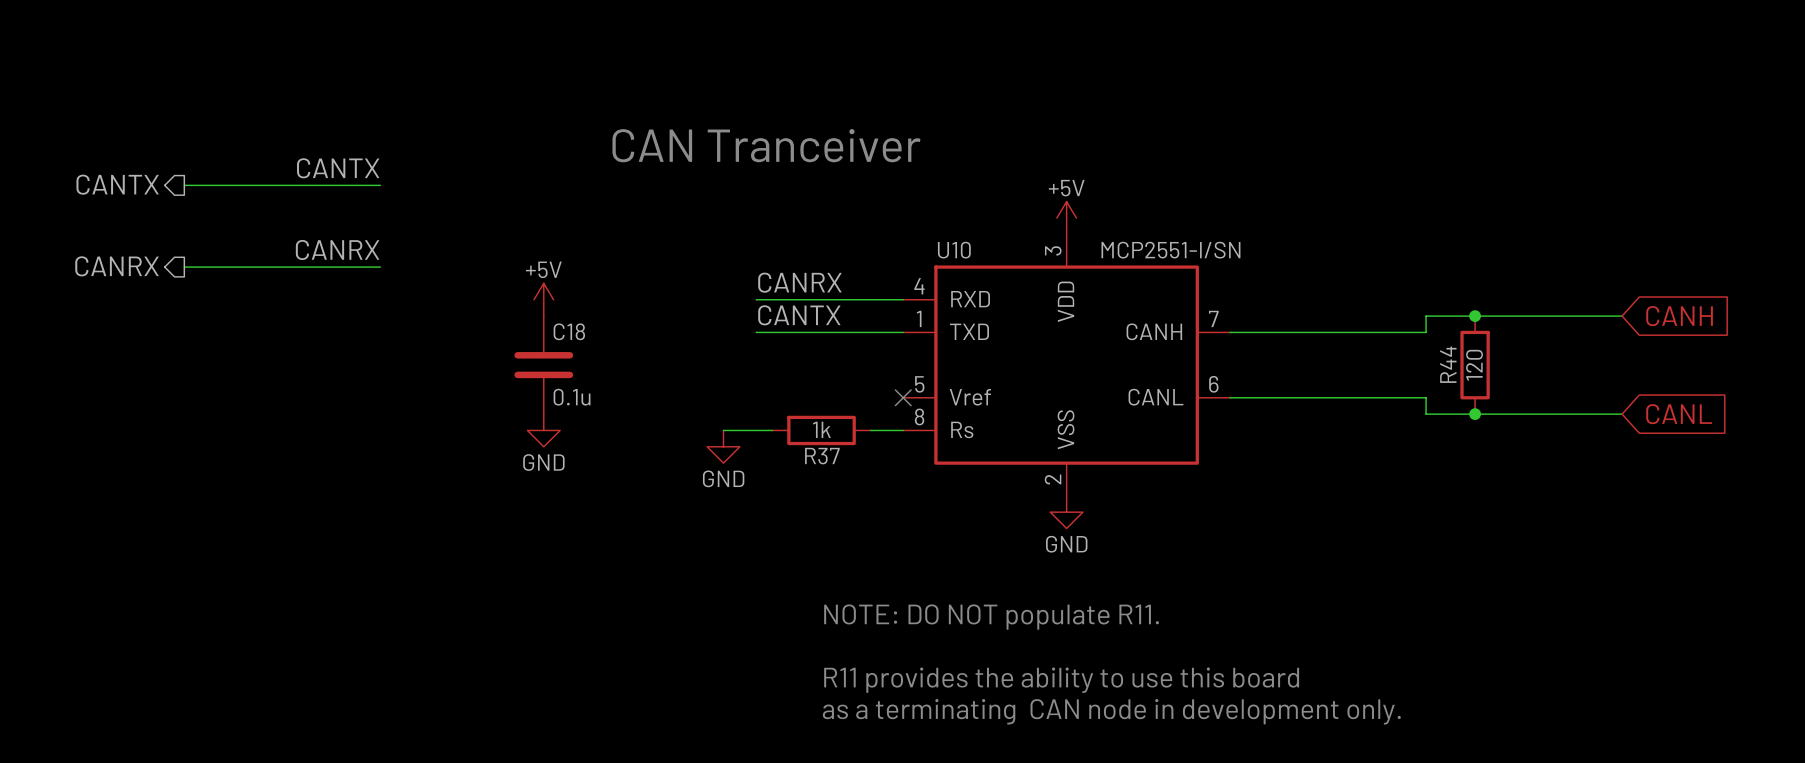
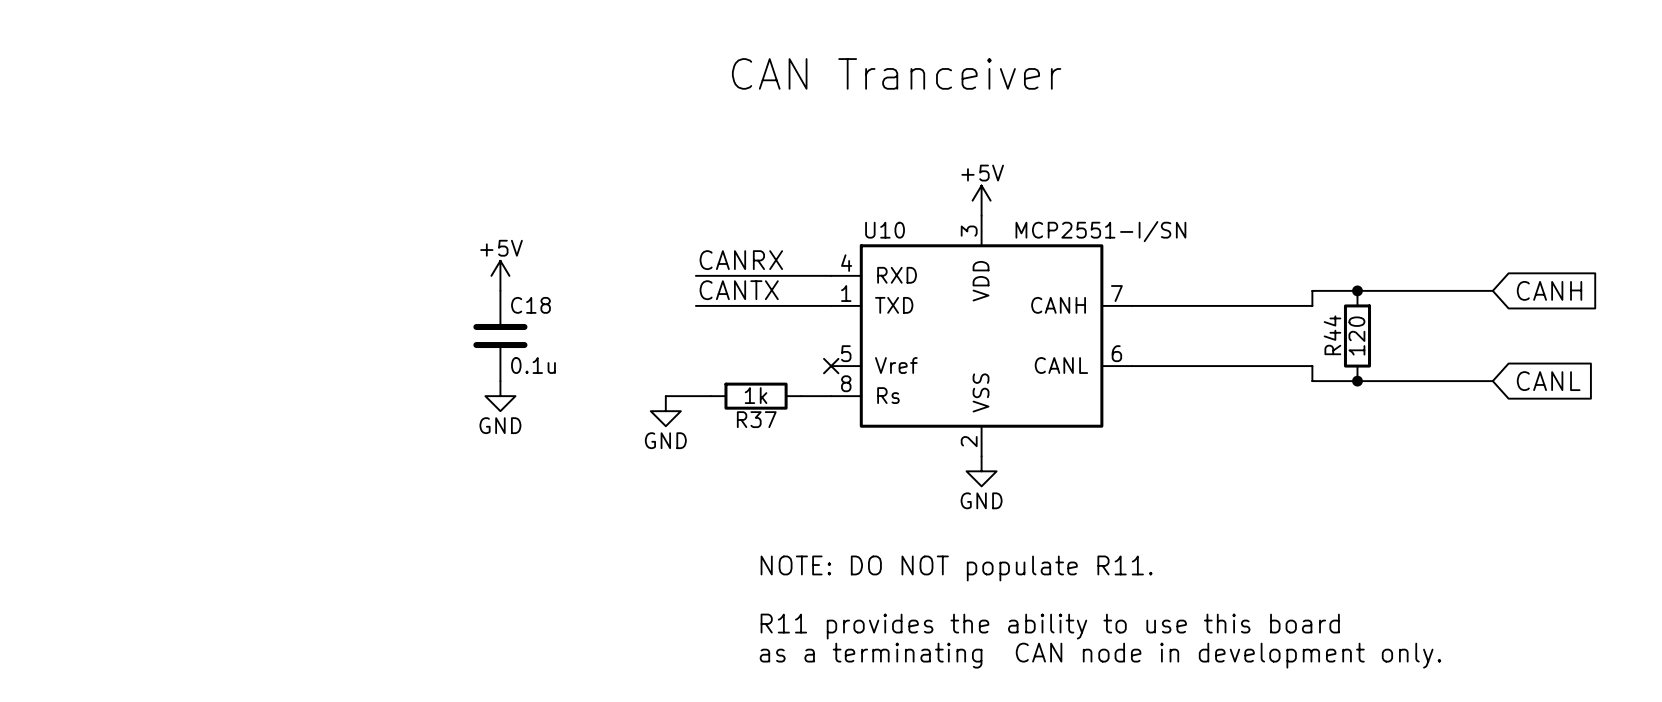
text position: CAN Tranceiver (766, 145) -> CAN Tranceiver (896, 73)
label: CANTX (338, 168) -> none
hierarchical label: CANTX (117, 184) -> none
wire: (184, 185) (380, 185) -> none
label: CANRX (337, 249) -> none
hierarchical label: CANRX (117, 266) -> none
wire: (184, 267) (380, 267) -> none

